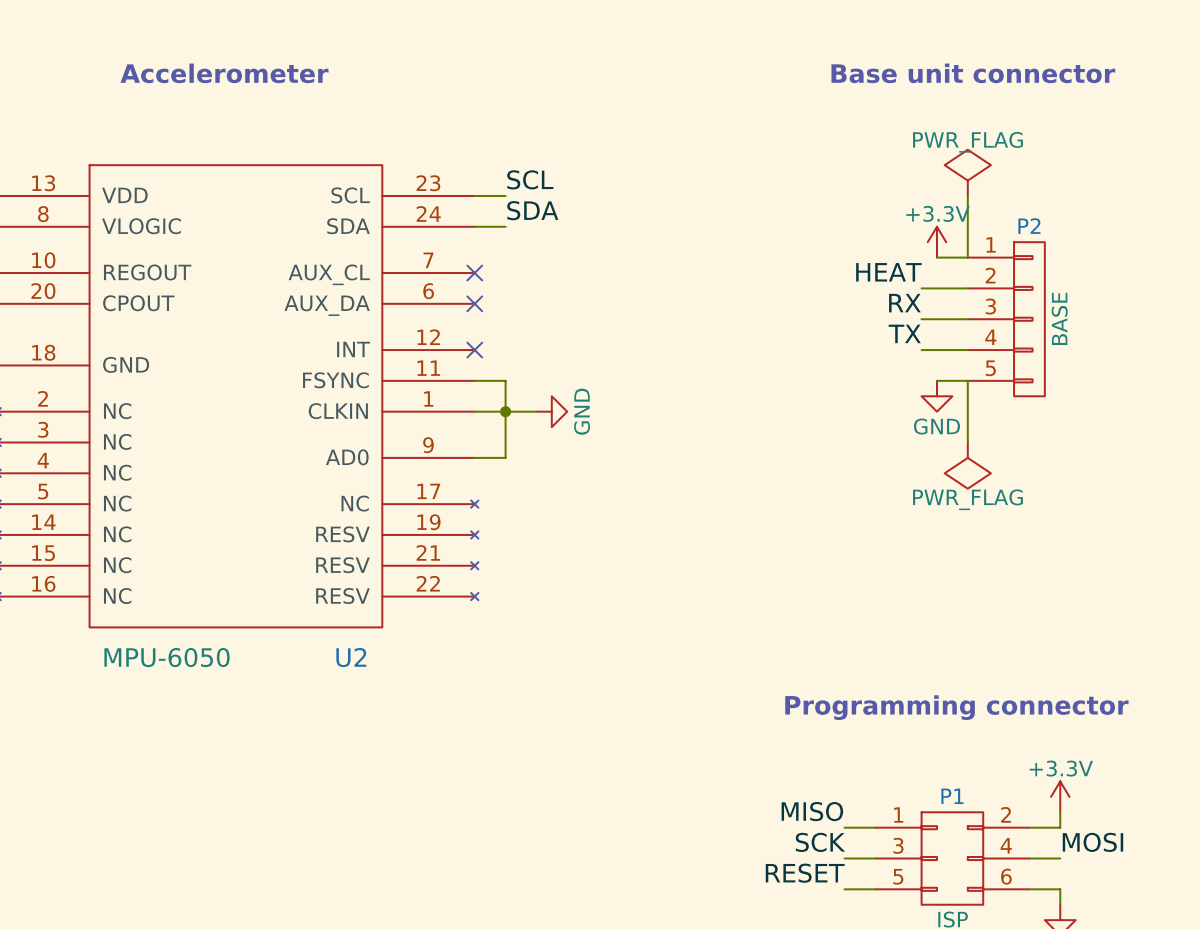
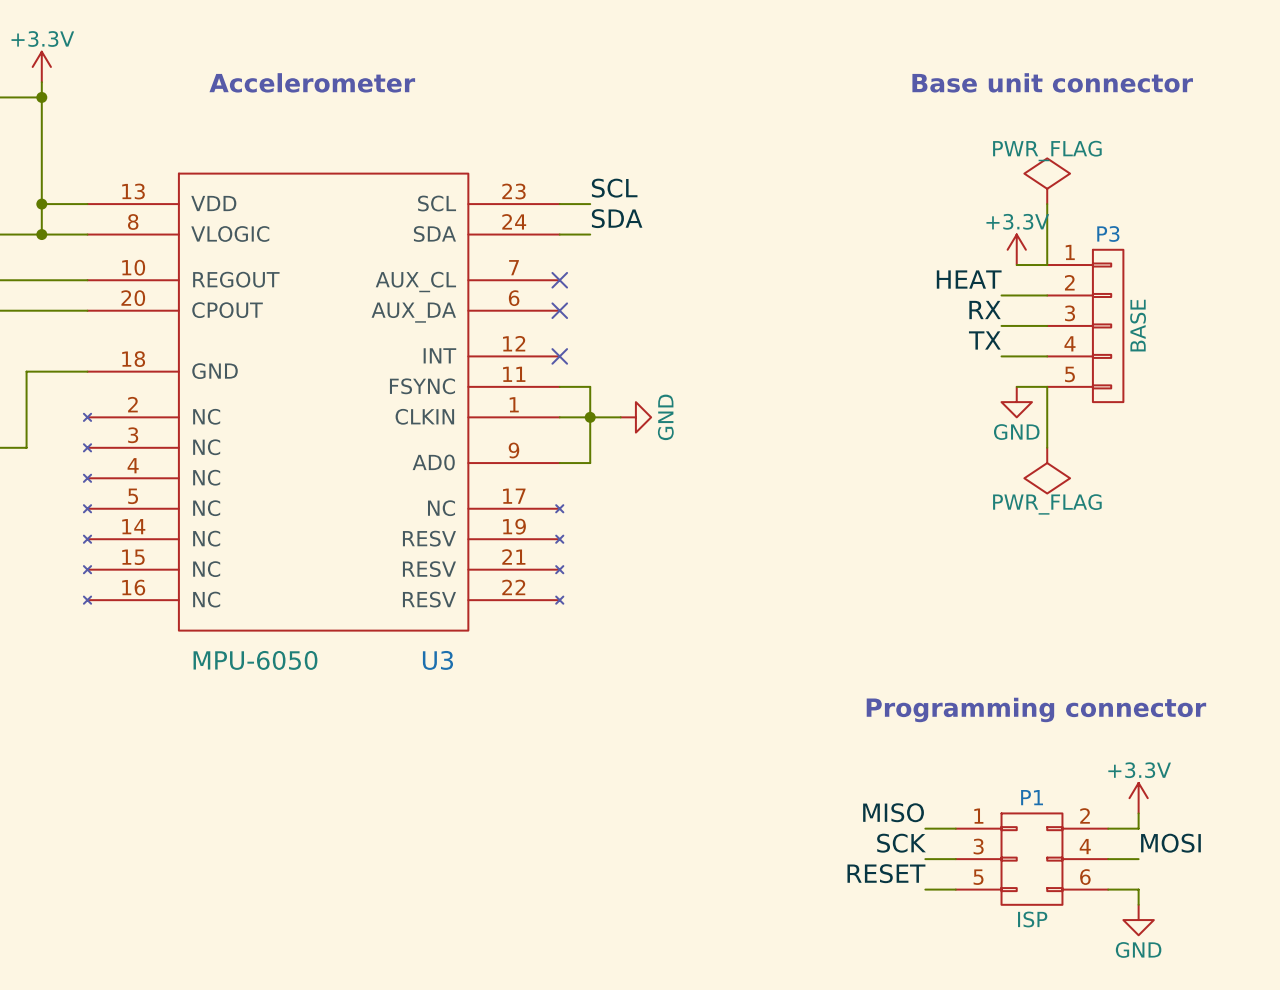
P2 name: P2 (1029, 226) -> P3 (1108, 233)
U2 name: U2 (351, 657) -> U3 (437, 660)

